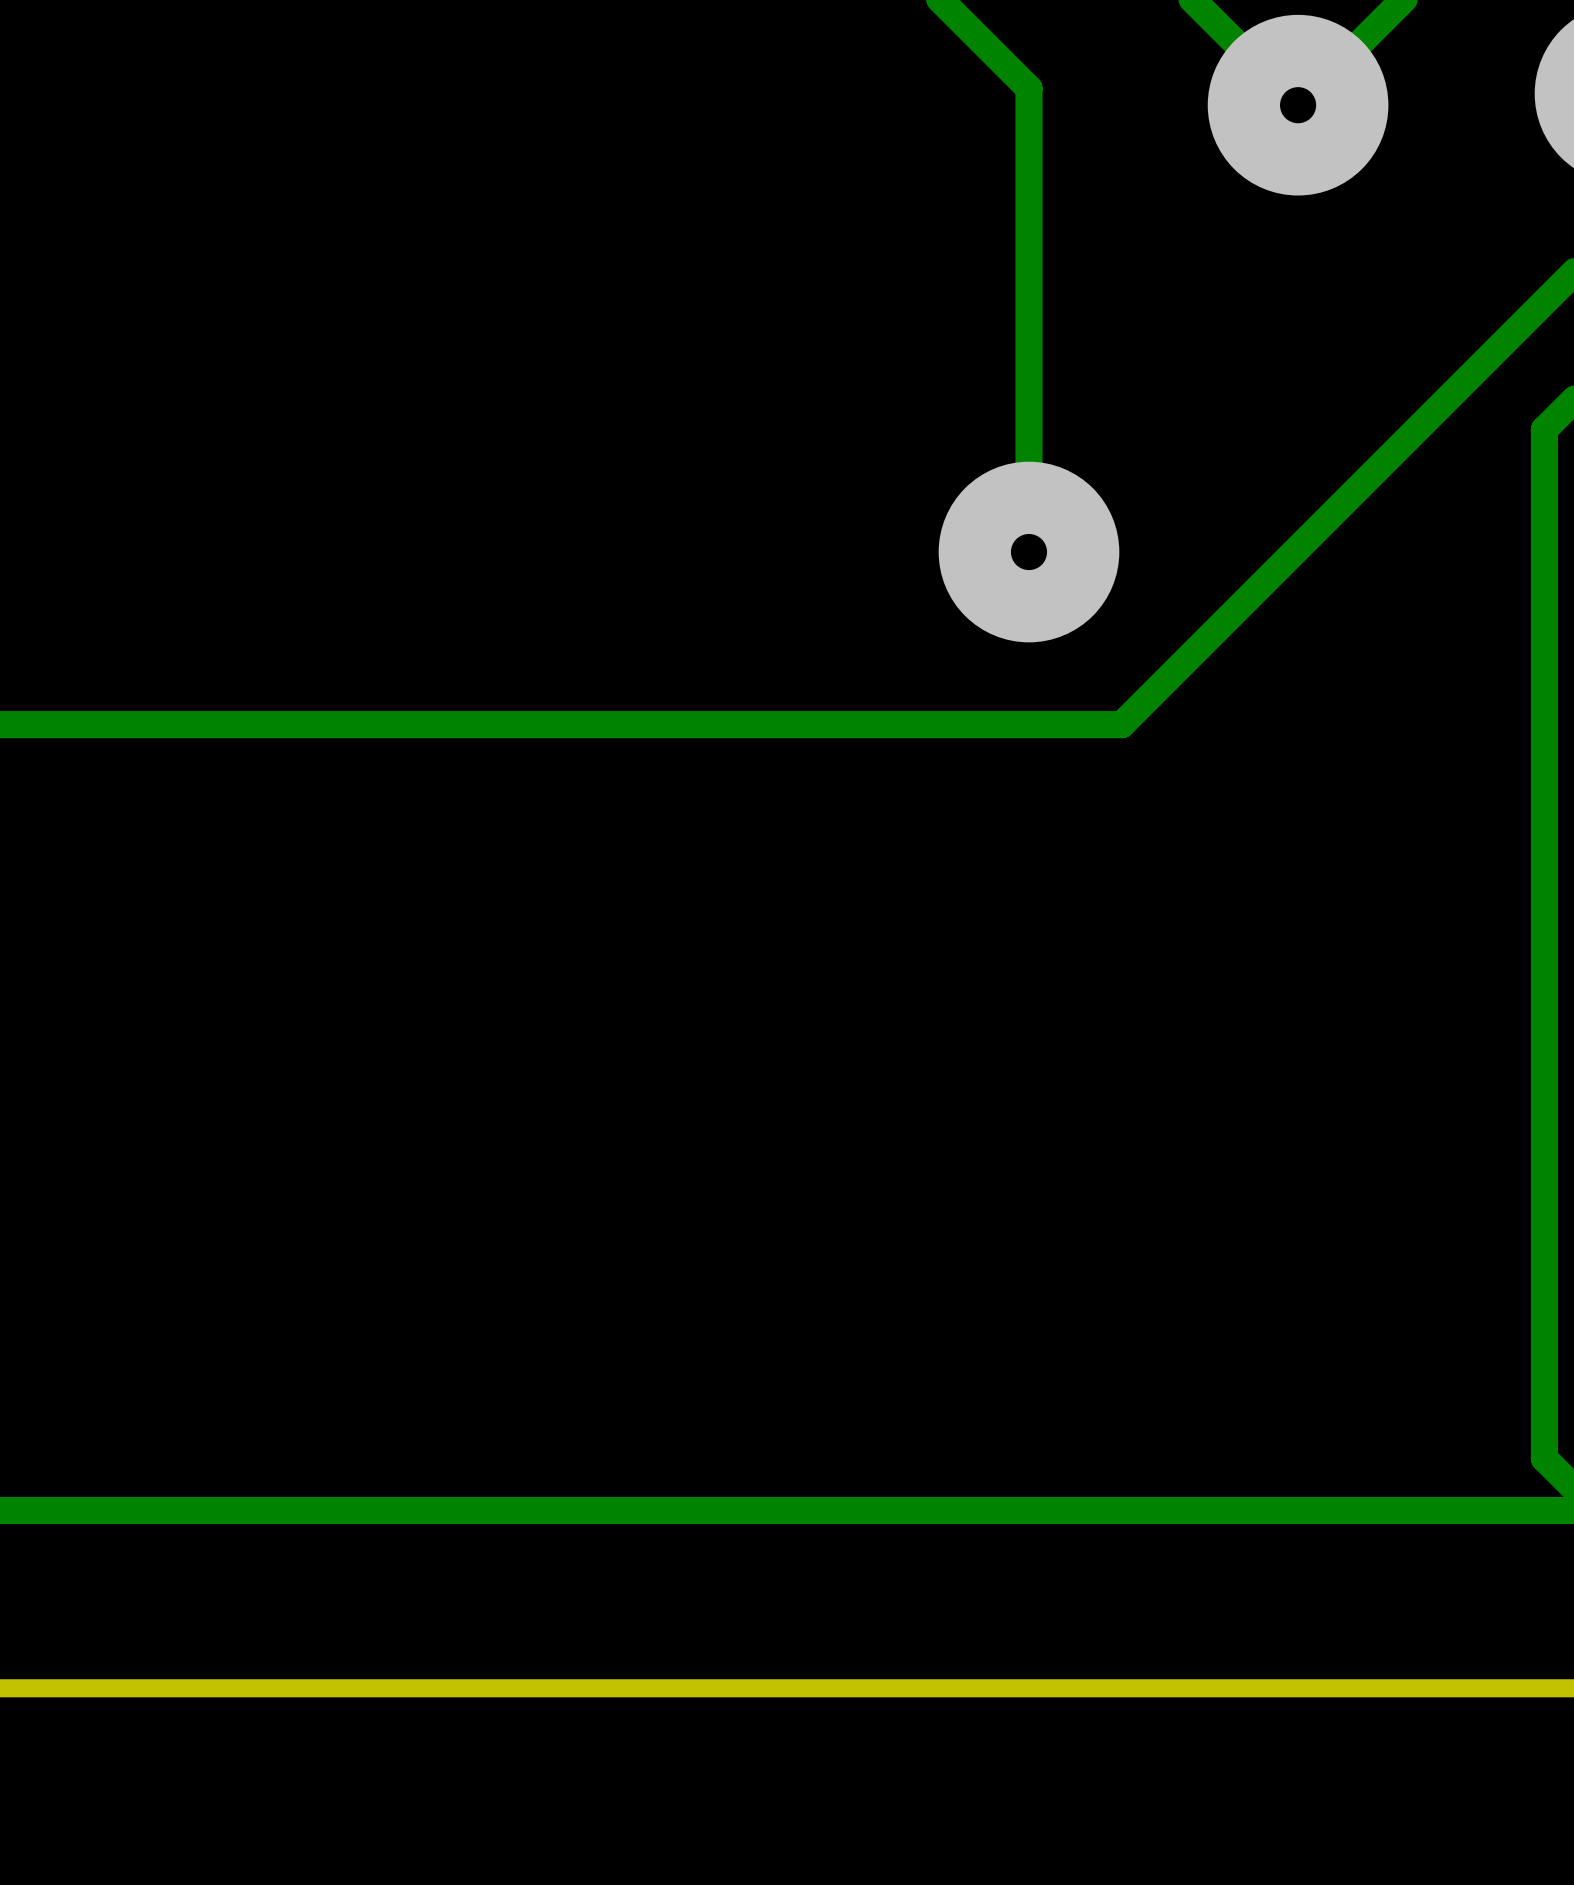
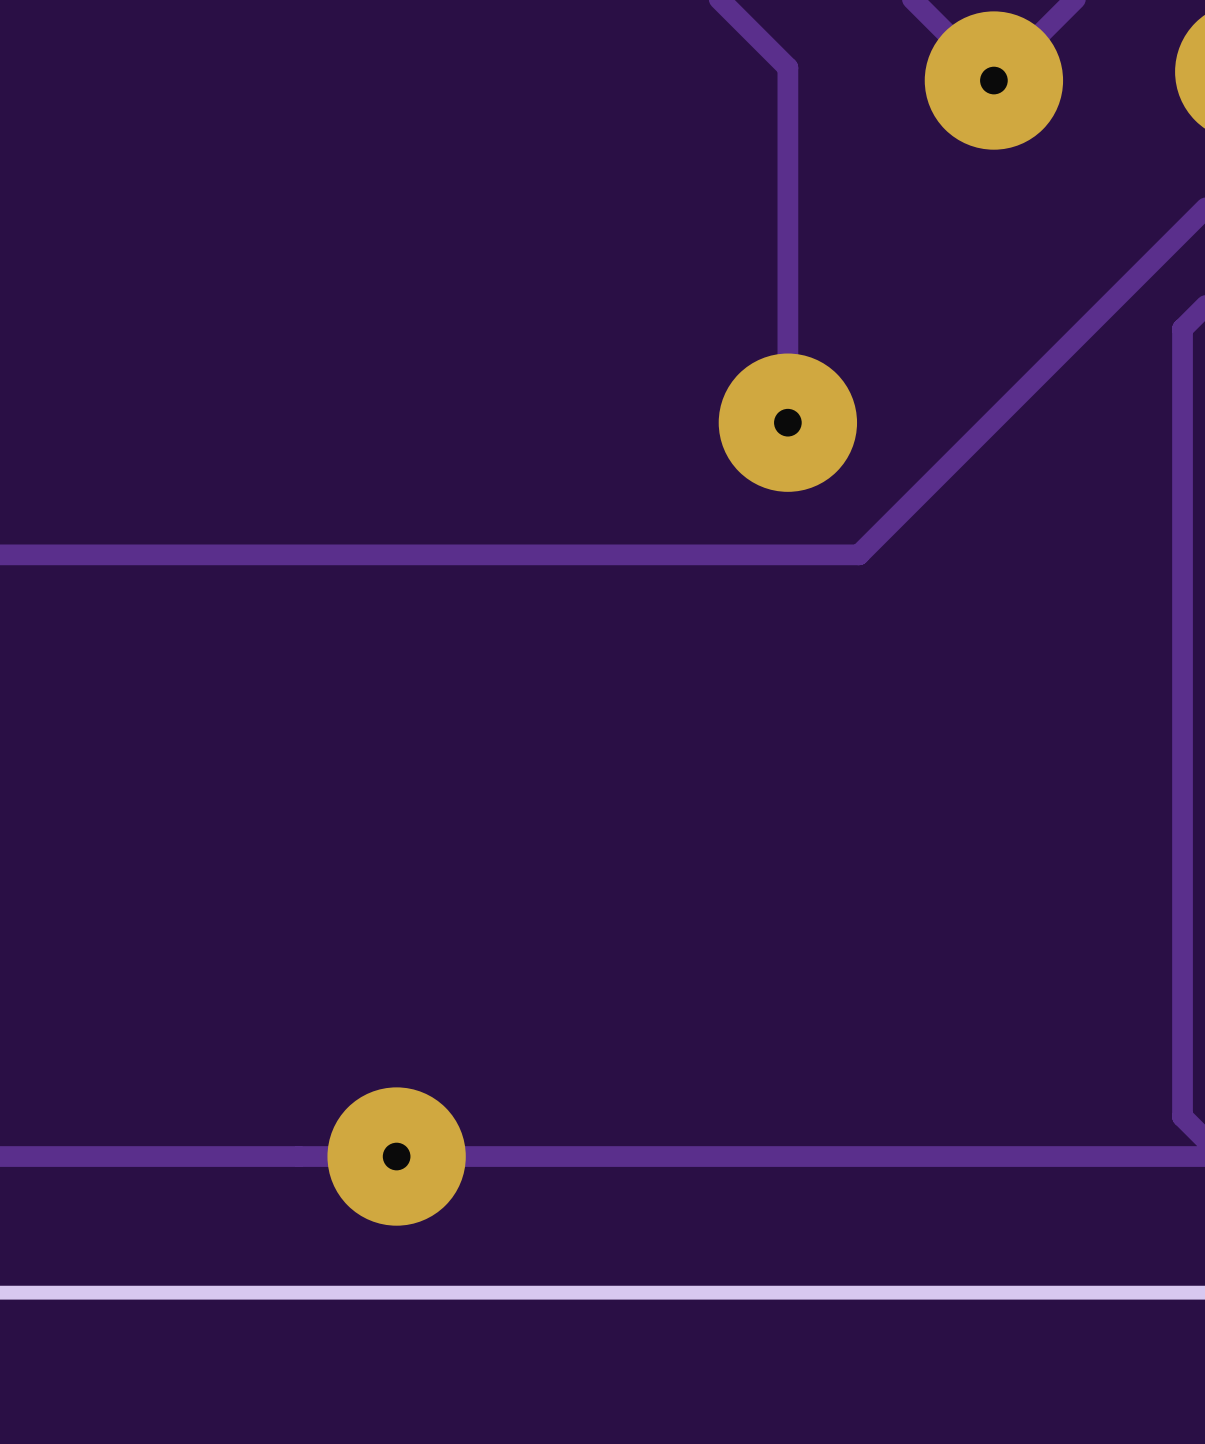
via: none -> (396, 1156)

